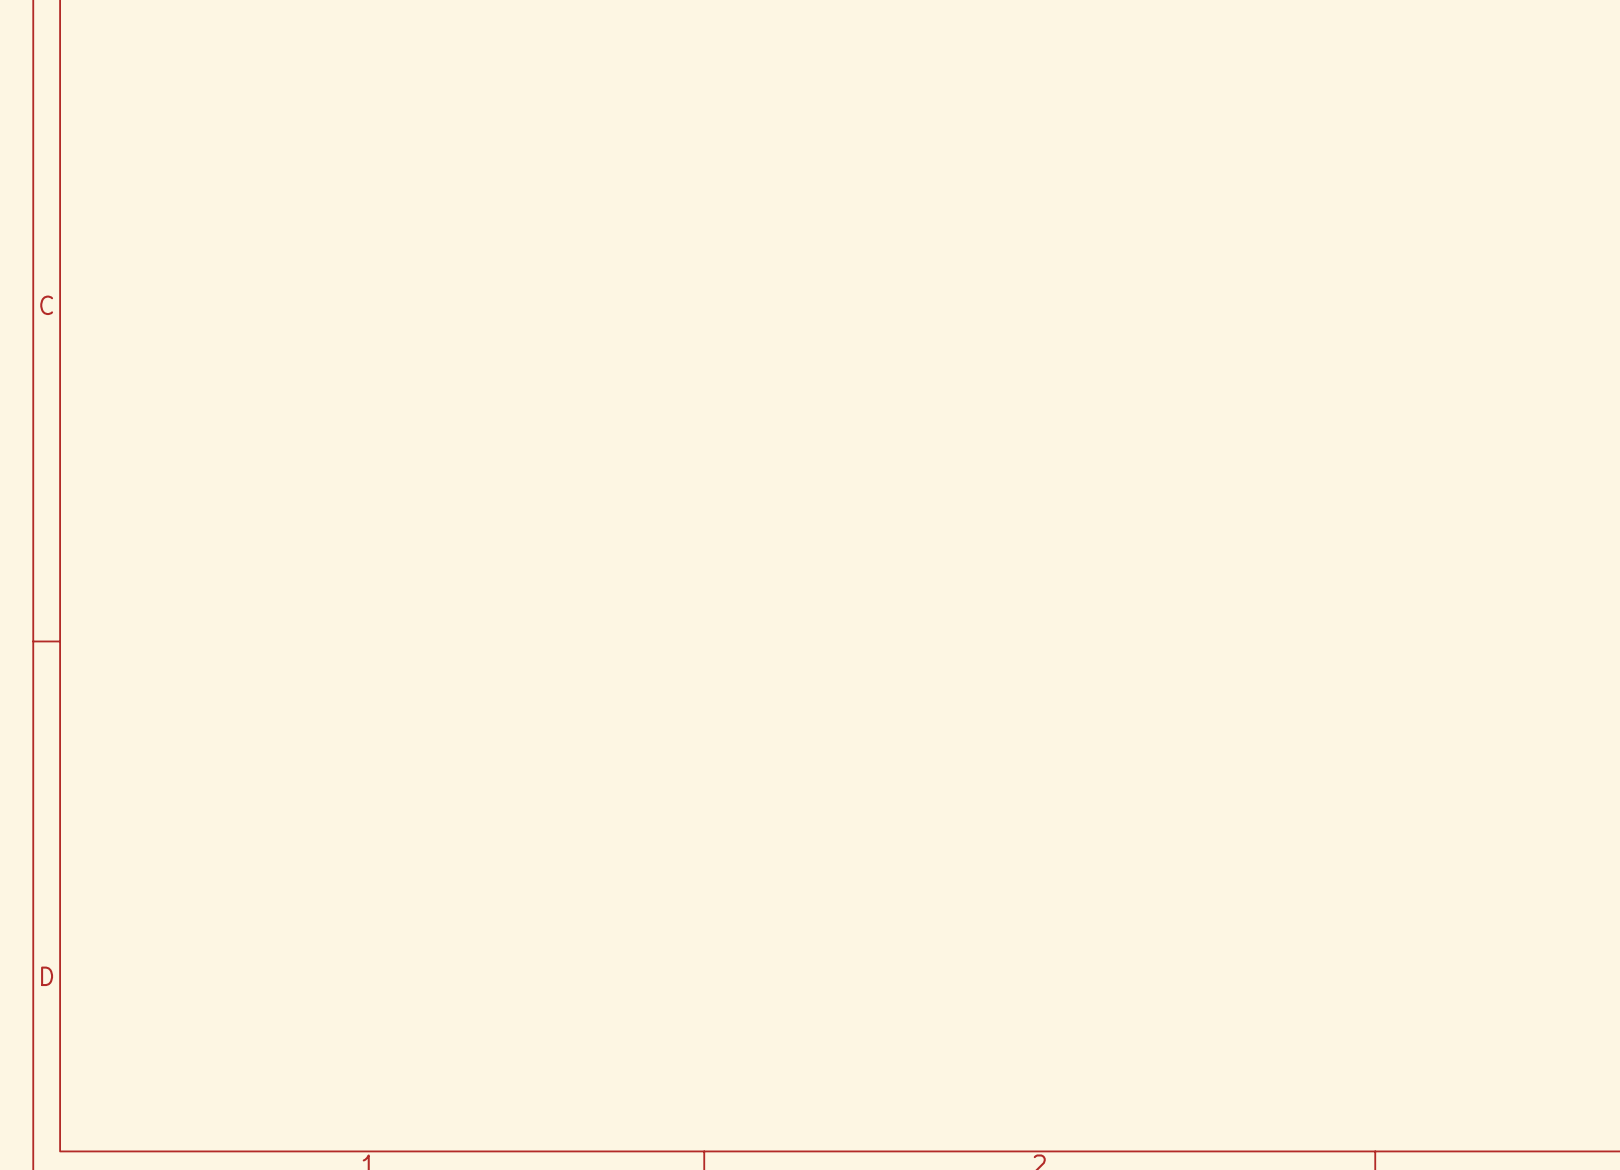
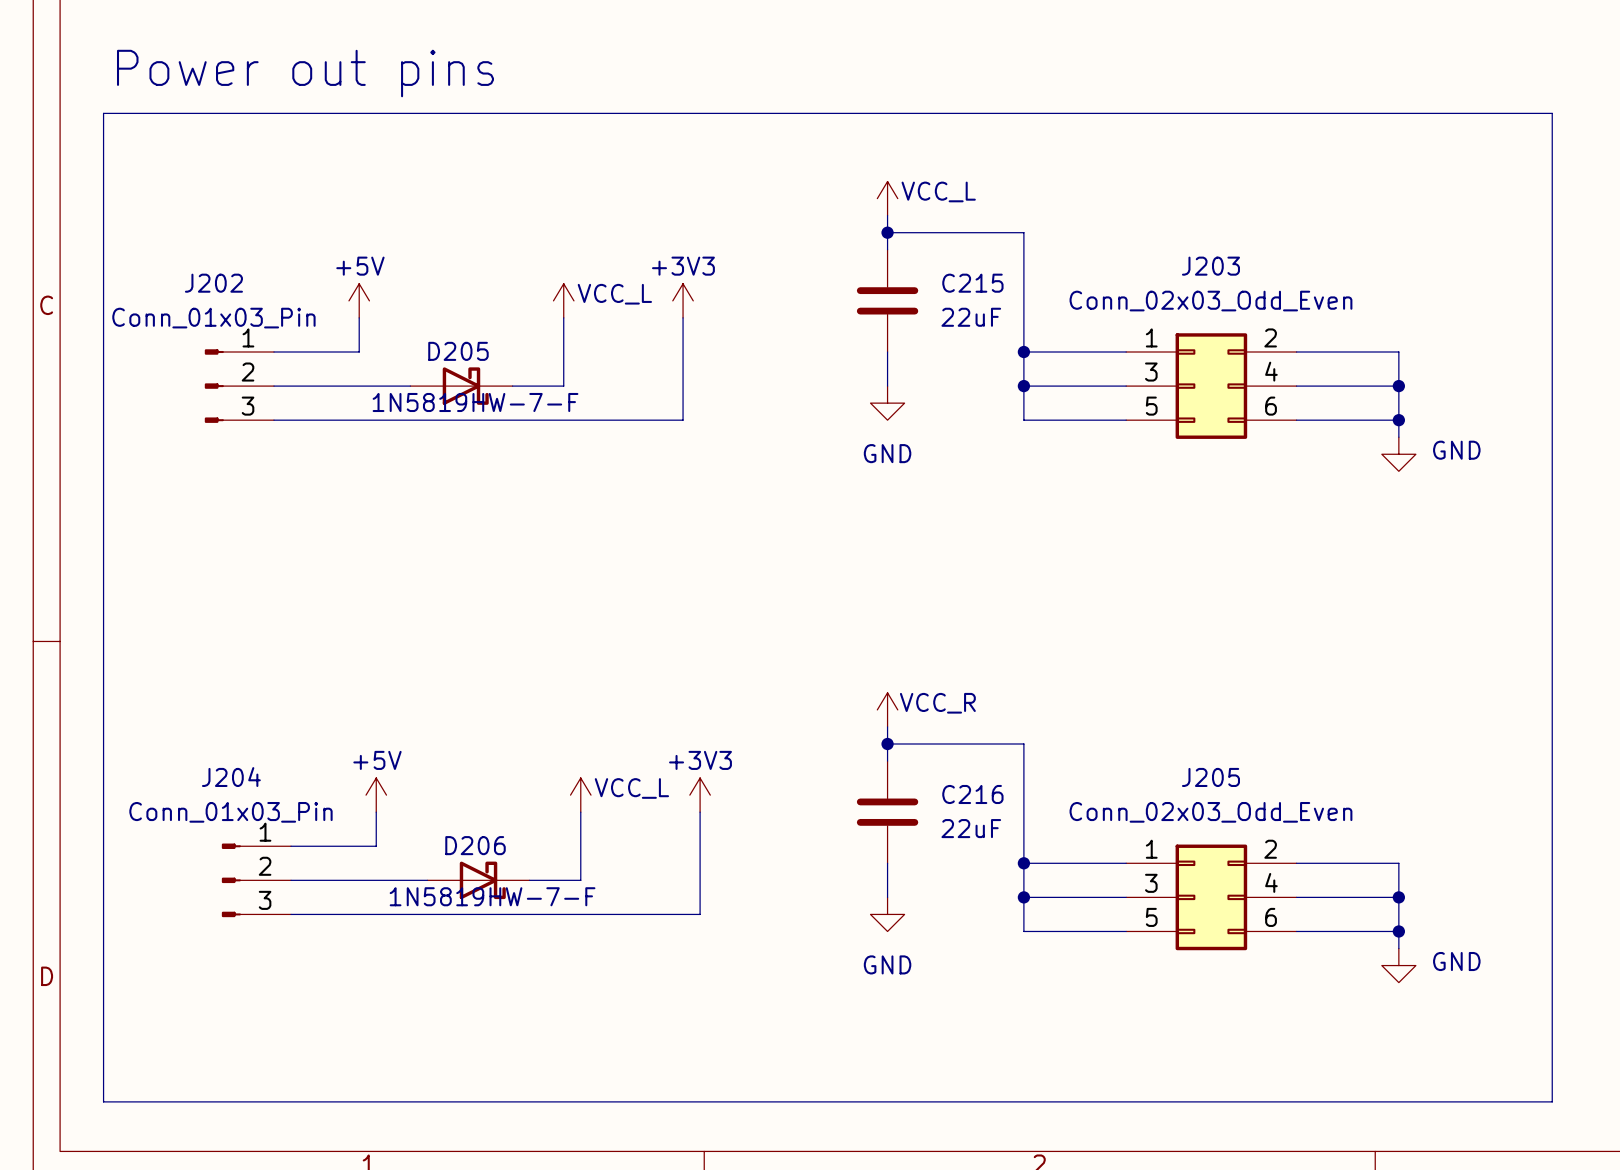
text: none -> Power out pins (305, 73)
line: none -> (103, 113) (1552, 113) (1552, 1101) (103, 1101) (103, 113)
power symbol: none -> VCC_L (887, 198)
wire: none -> (887, 215) (887, 249)
wire: none -> (887, 232) (1023, 232) (1023, 420) (1126, 420)
junction: none -> (887, 232)
power symbol: none -> +5V (359, 300)
power symbol: none -> VCC_L (563, 300)
power symbol: none -> +3V3 (683, 300)
C215: none -> 22uF (887, 300)
wire: none -> (359, 317) (359, 352) (273, 352)
wire: none -> (563, 317) (563, 386) (512, 386)
wire: none -> (683, 317) (683, 420) (273, 420)
wire: none -> (887, 352) (887, 386)
wire: none -> (1023, 352) (1126, 352)
junction: none -> (1023, 352)
wire: none -> (1296, 352) (1398, 352) (1398, 437)
J202: none -> Conn_01x03_Pin (239, 386)
wire: none -> (273, 386) (410, 386)
D205: none -> 1N5819HW-7-F (461, 386)
wire: none -> (1023, 386) (1126, 386)
junction: none -> (1023, 386)
J203: none -> Conn_02x03_Odd_Even (1211, 386)
wire: none -> (1296, 386) (1398, 386)
junction: none -> (1398, 386)
power symbol: none -> GND (887, 403)
wire: none -> (1296, 420) (1398, 420)
junction: none -> (1398, 420)
power symbol: none -> GND (1398, 454)
power symbol: none -> VCC_R (887, 709)
wire: none -> (887, 726) (887, 761)
wire: none -> (887, 743) (1023, 743) (1023, 931) (1126, 931)
junction: none -> (887, 743)
power symbol: none -> +5V (376, 795)
power symbol: none -> VCC_L (580, 795)
power symbol: none -> +3V3 (700, 795)
wire: none -> (376, 812) (376, 846) (291, 846)
wire: none -> (580, 812) (580, 880) (529, 880)
wire: none -> (700, 812) (700, 914) (291, 914)
C216: none -> 22uF (887, 812)
wire: none -> (887, 863) (887, 897)
wire: none -> (1023, 863) (1126, 863)
junction: none -> (1023, 863)
wire: none -> (1296, 863) (1398, 863) (1398, 948)
J204: none -> Conn_01x03_Pin (256, 880)
wire: none -> (291, 880) (427, 880)
D206: none -> 1N5819HW-7-F (478, 880)
wire: none -> (1023, 897) (1126, 897)
junction: none -> (1023, 897)
J205: none -> Conn_02x03_Odd_Even (1211, 897)
wire: none -> (1296, 897) (1398, 897)
junction: none -> (1398, 897)
power symbol: none -> GND (887, 914)
wire: none -> (1296, 931) (1398, 931)
junction: none -> (1398, 931)
power symbol: none -> GND (1398, 965)

